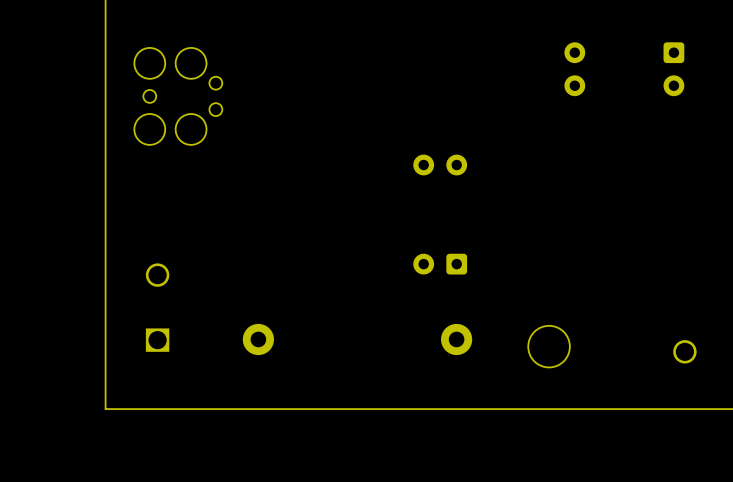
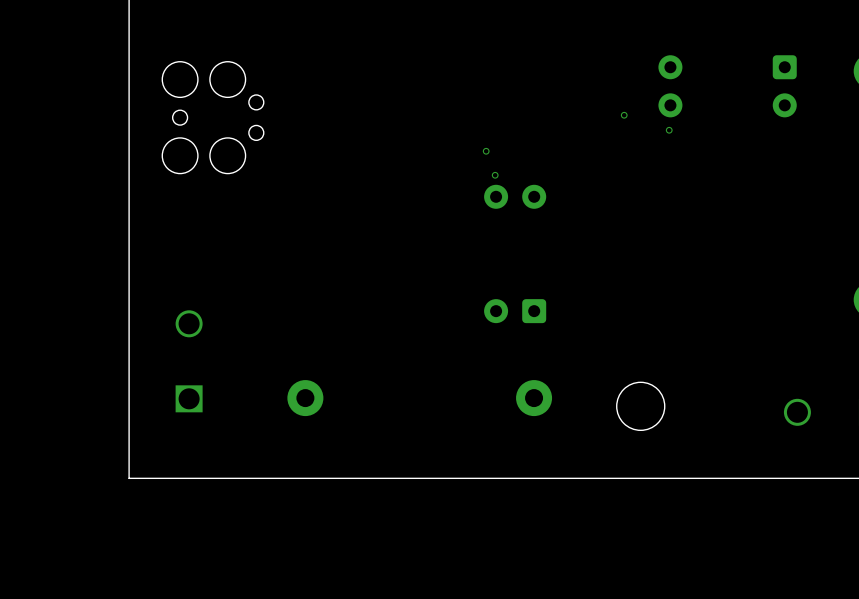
via: none -> (624, 115)
via: none -> (669, 130)
via: none -> (486, 151)
via: none -> (495, 175)

